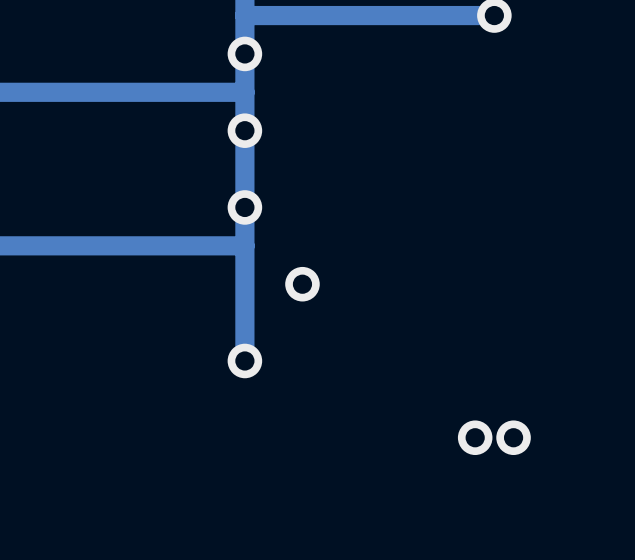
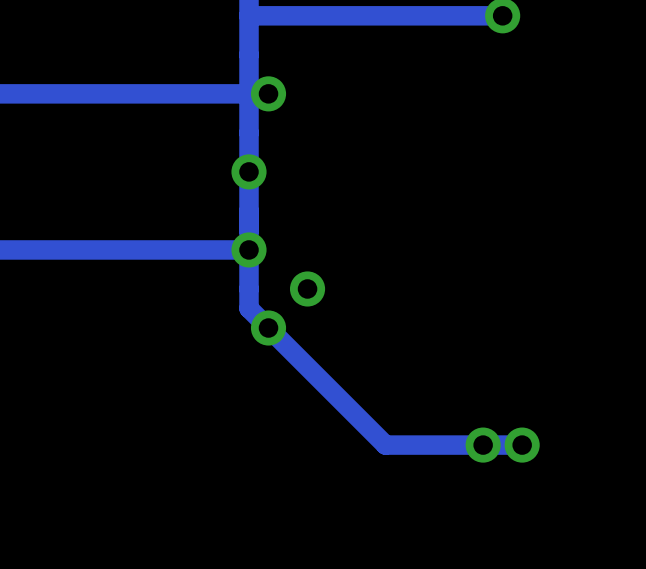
via: (244, 53) -> none
via: none -> (268, 93)
via: (244, 130) -> none
via: none -> (249, 171)
via: (244, 207) -> none
via: none -> (249, 249)
track: (244, 303) (244, 360) -> (249, 308) (385, 445) (522, 445)
via position: (244, 360) -> (268, 328)

